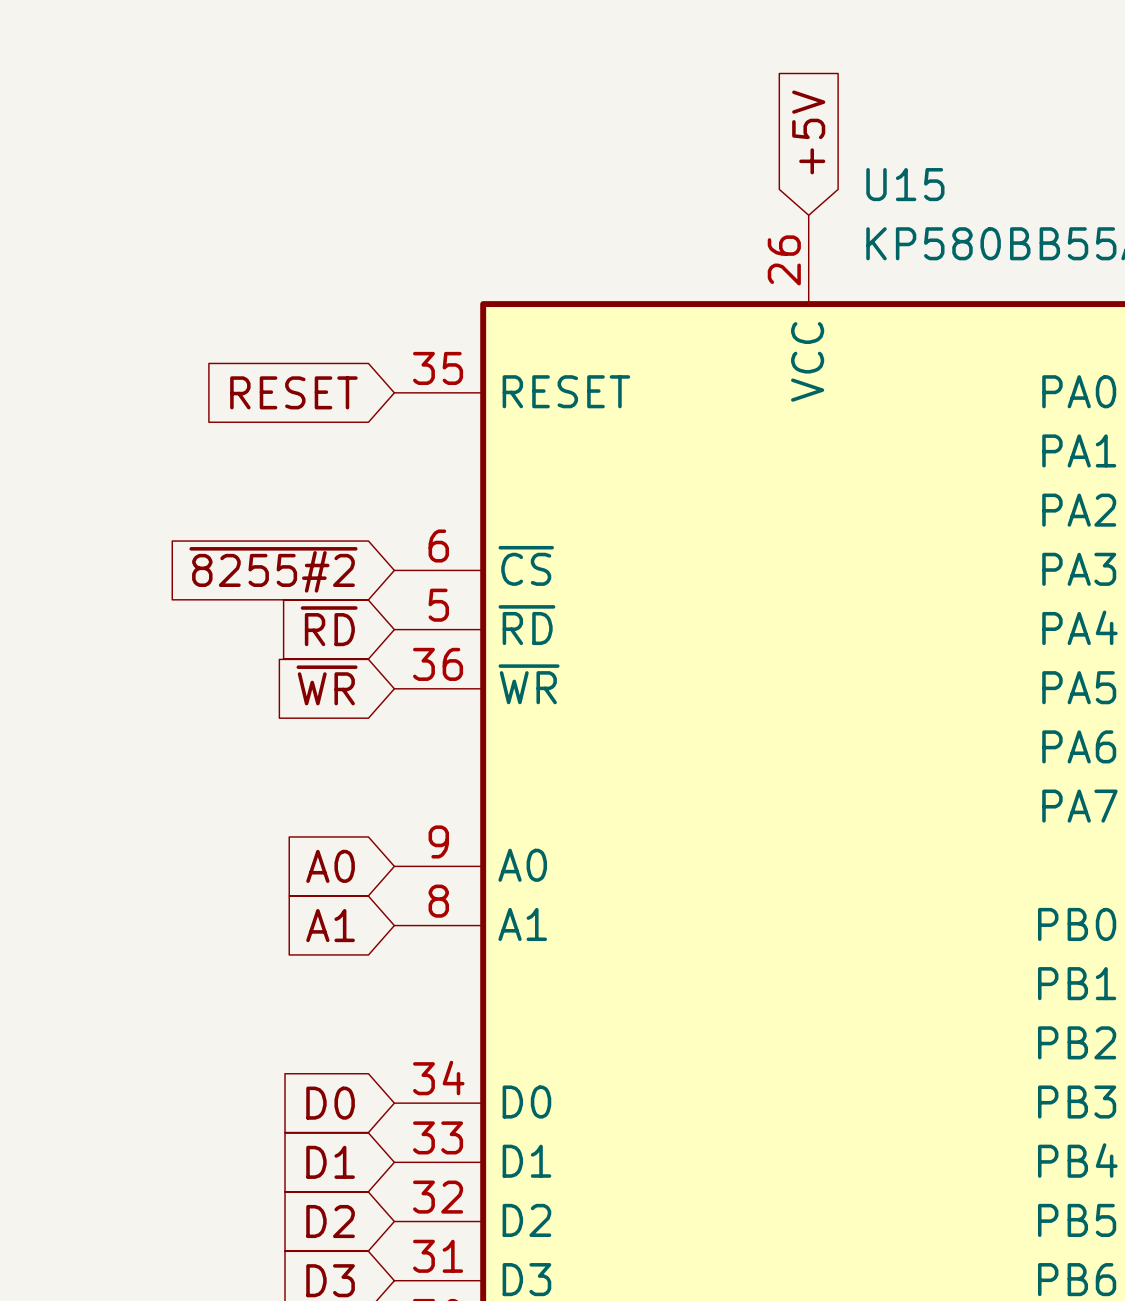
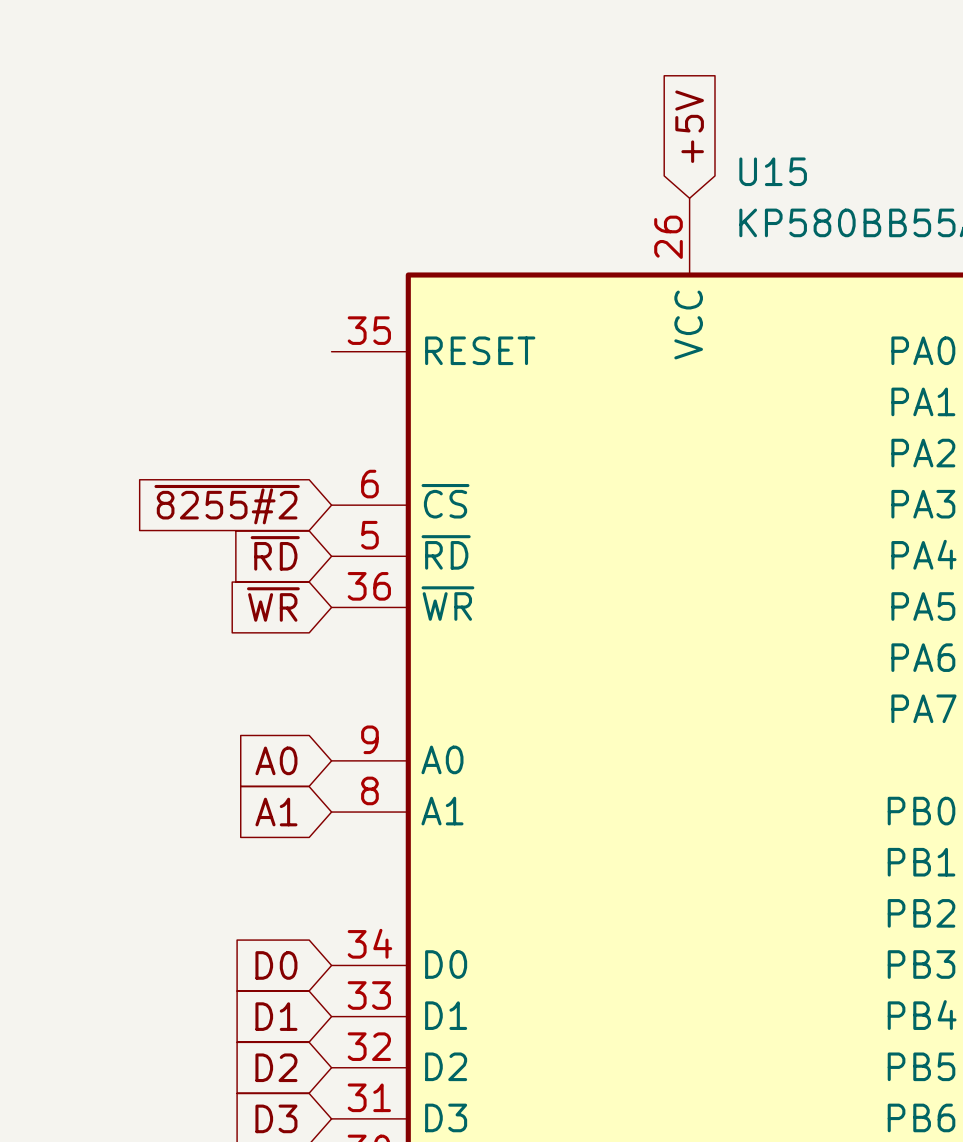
global label: RESET (293, 392) -> none

